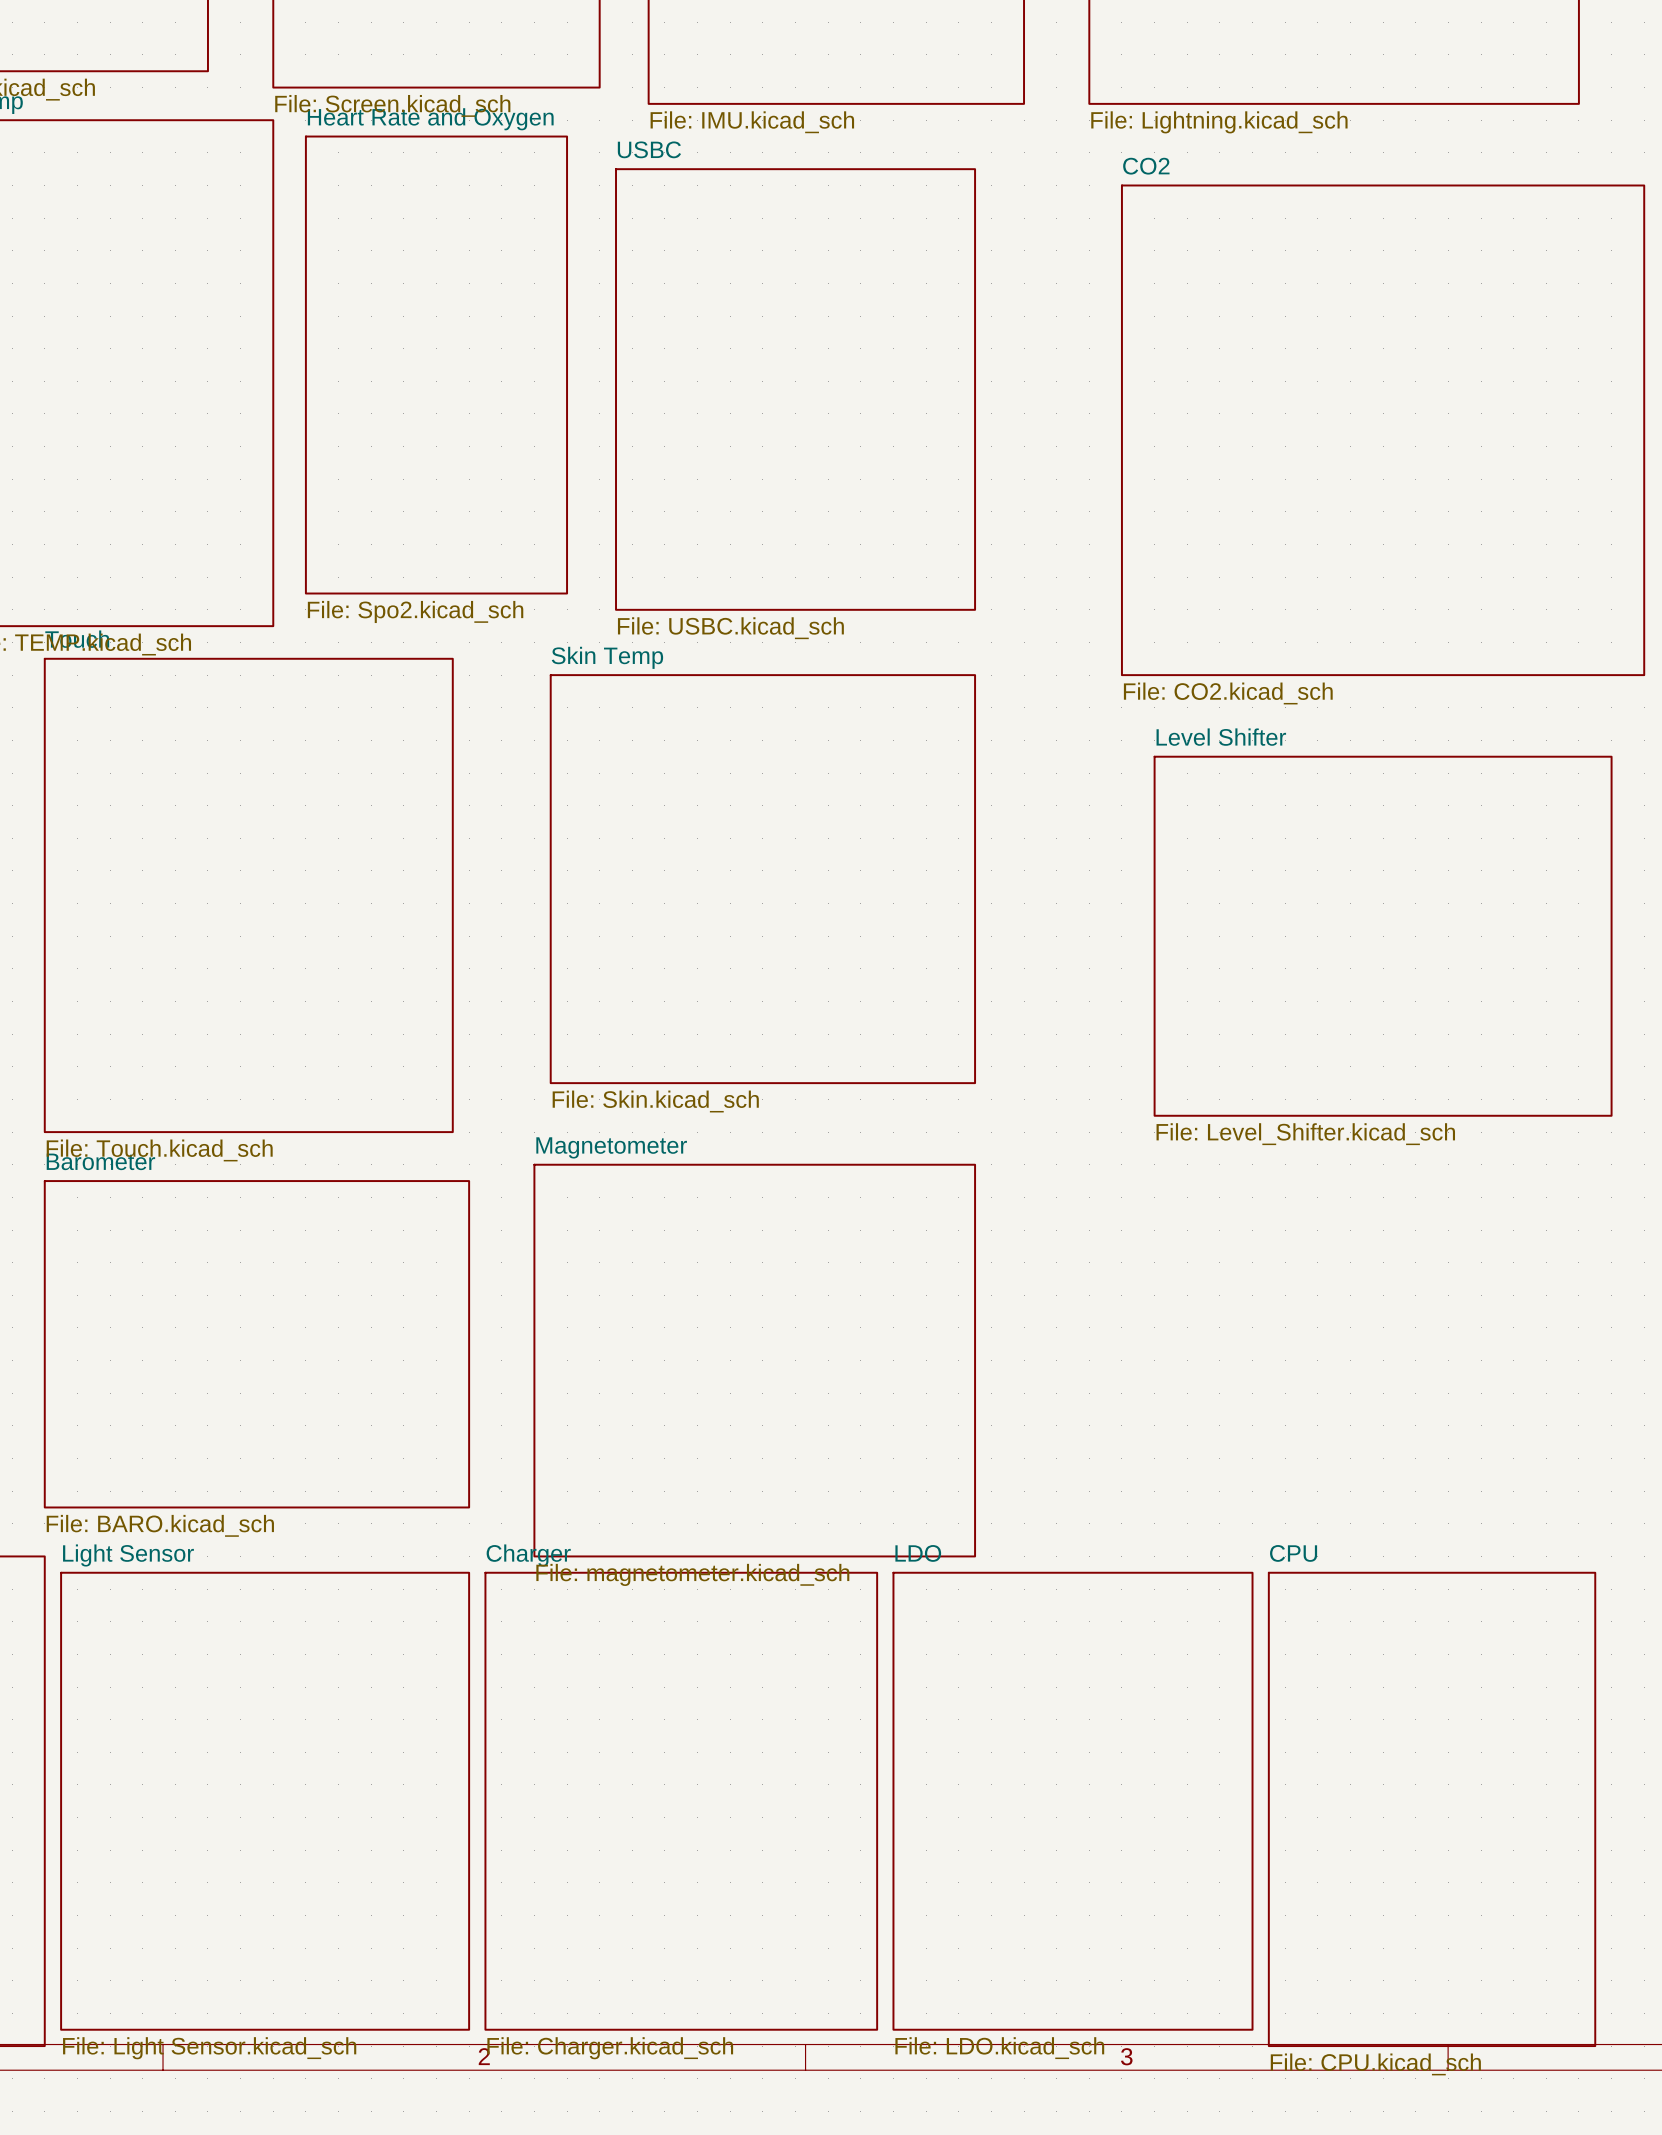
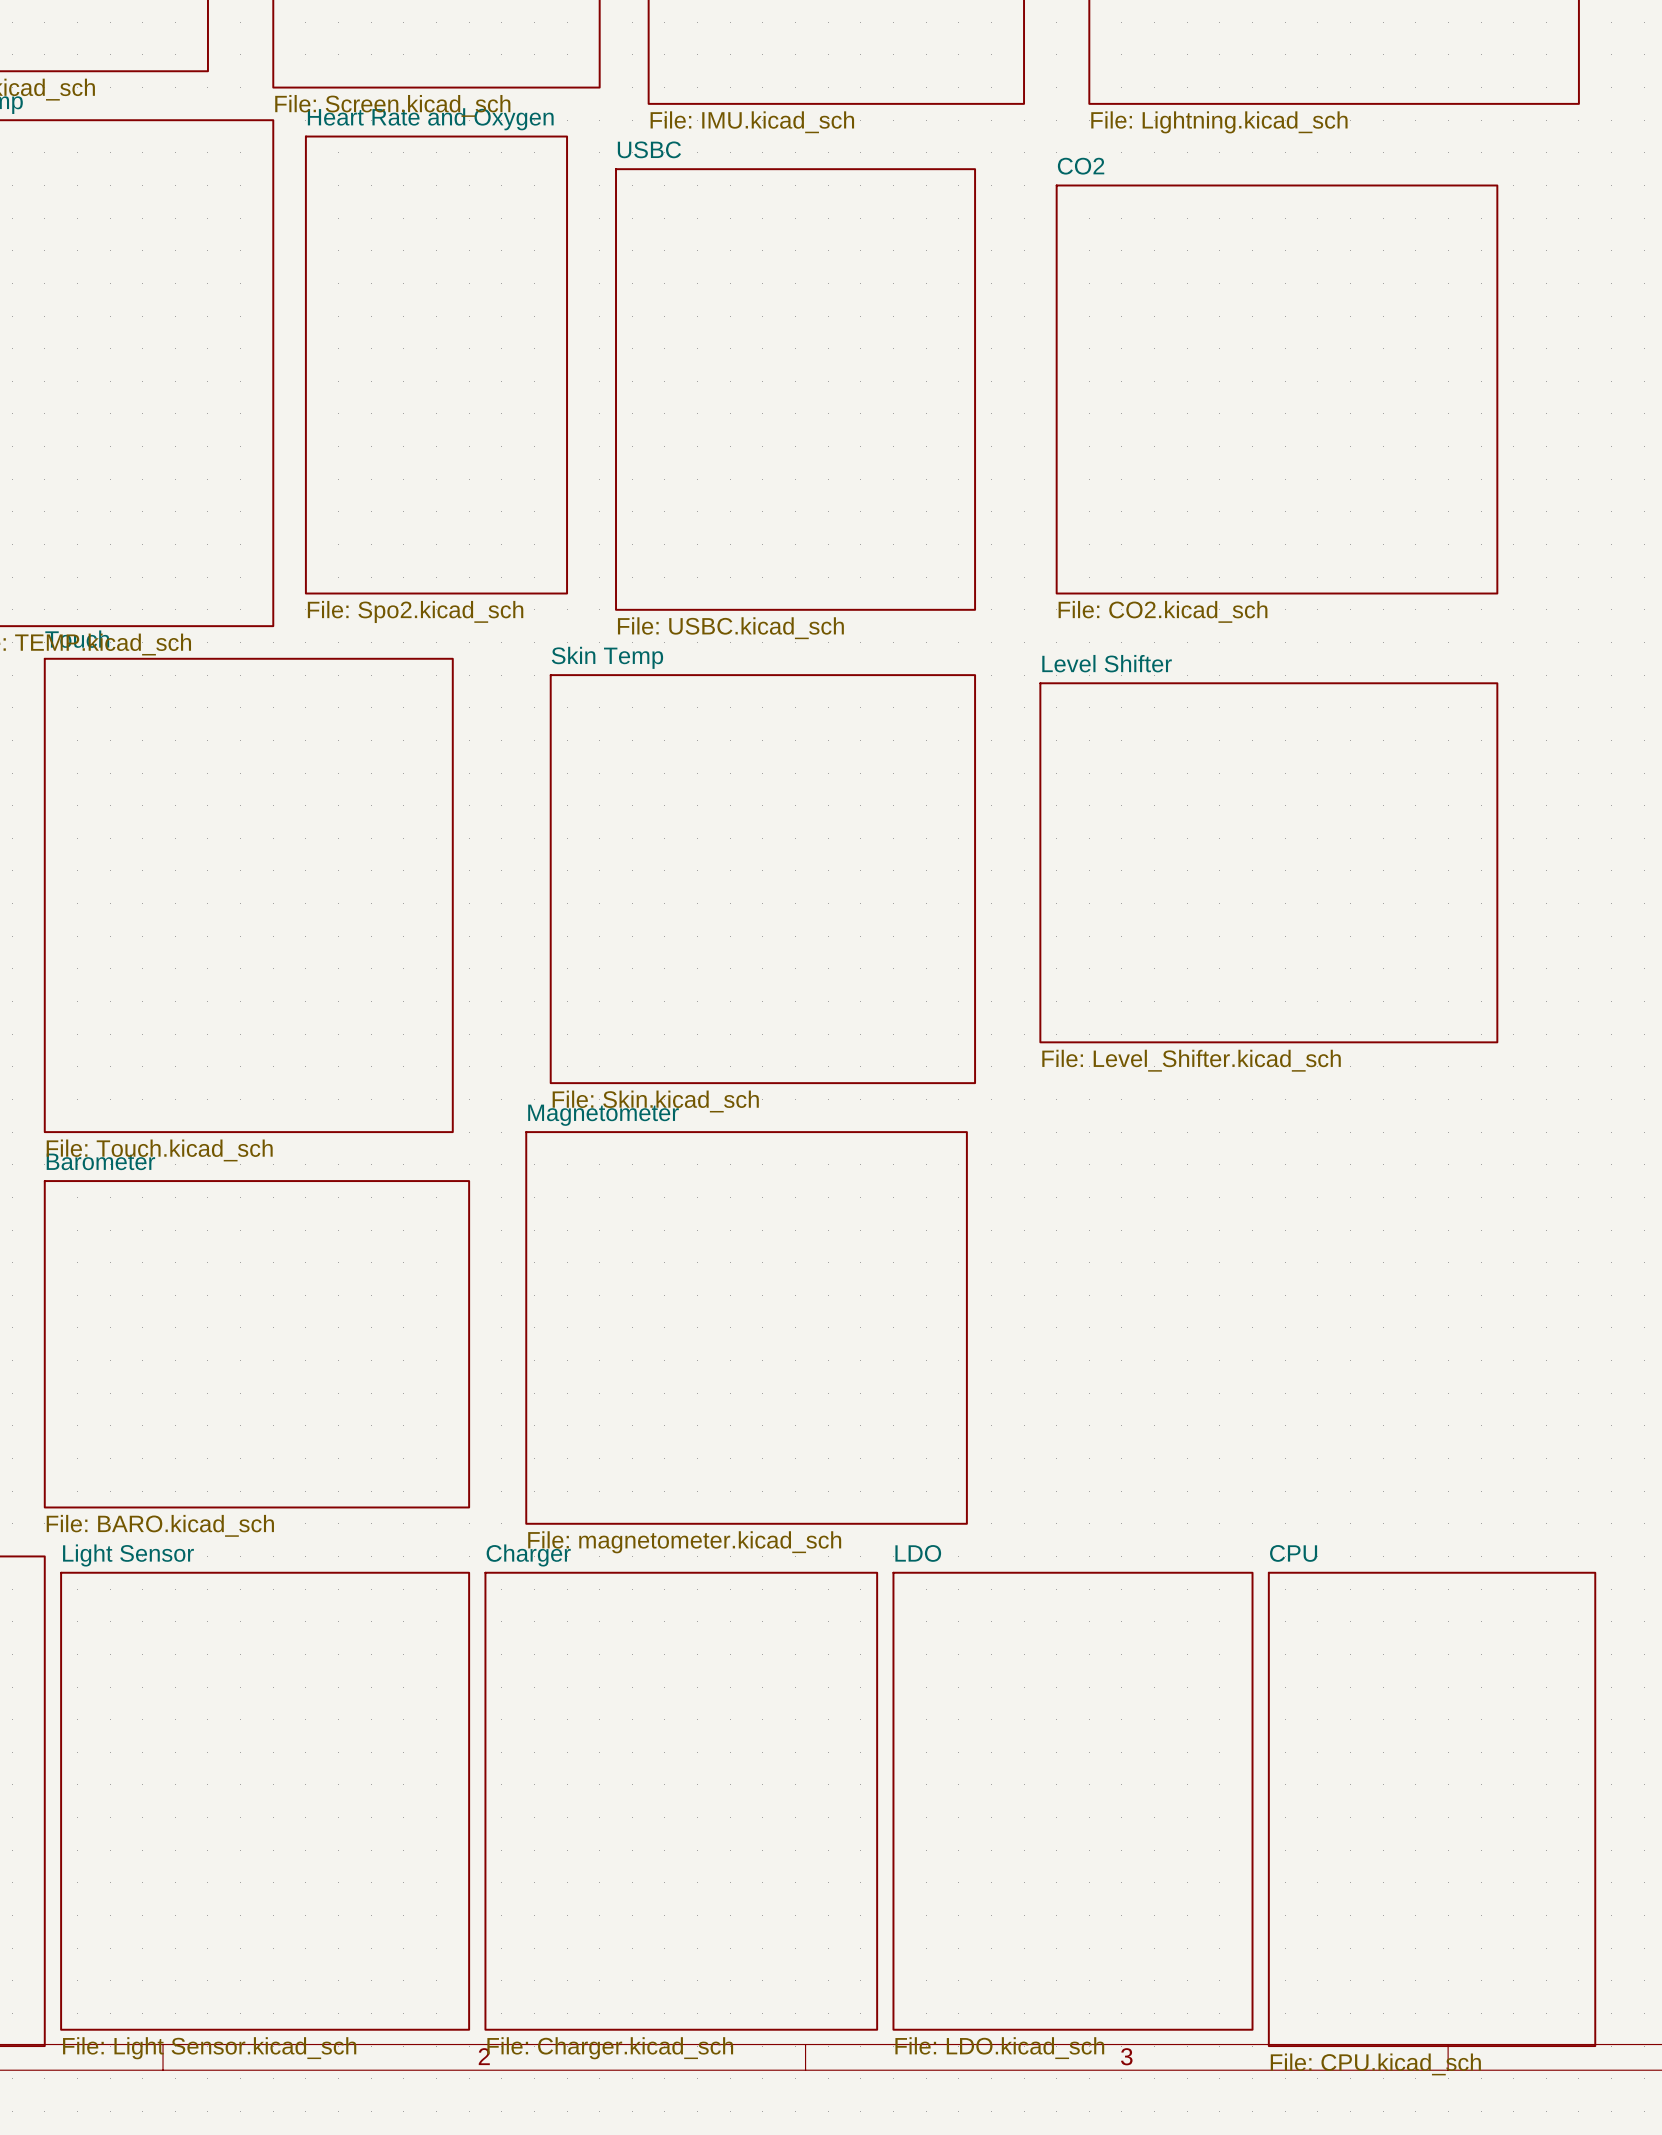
sheet CO2 name position: CO2 (1146, 166) -> CO2 (1081, 166)
sheet CO2 shape: [1120, 184, 1646, 677] -> [1055, 184, 1499, 595]
sheet CO2 value position: File: CO2.kicad_sch (1228, 693) -> File: CO2.kicad_sch (1163, 611)
sheet Level Shifter position: (1383, 936) -> (1268, 862)
sheet Magnetometer position: (754, 1360) -> (746, 1327)

